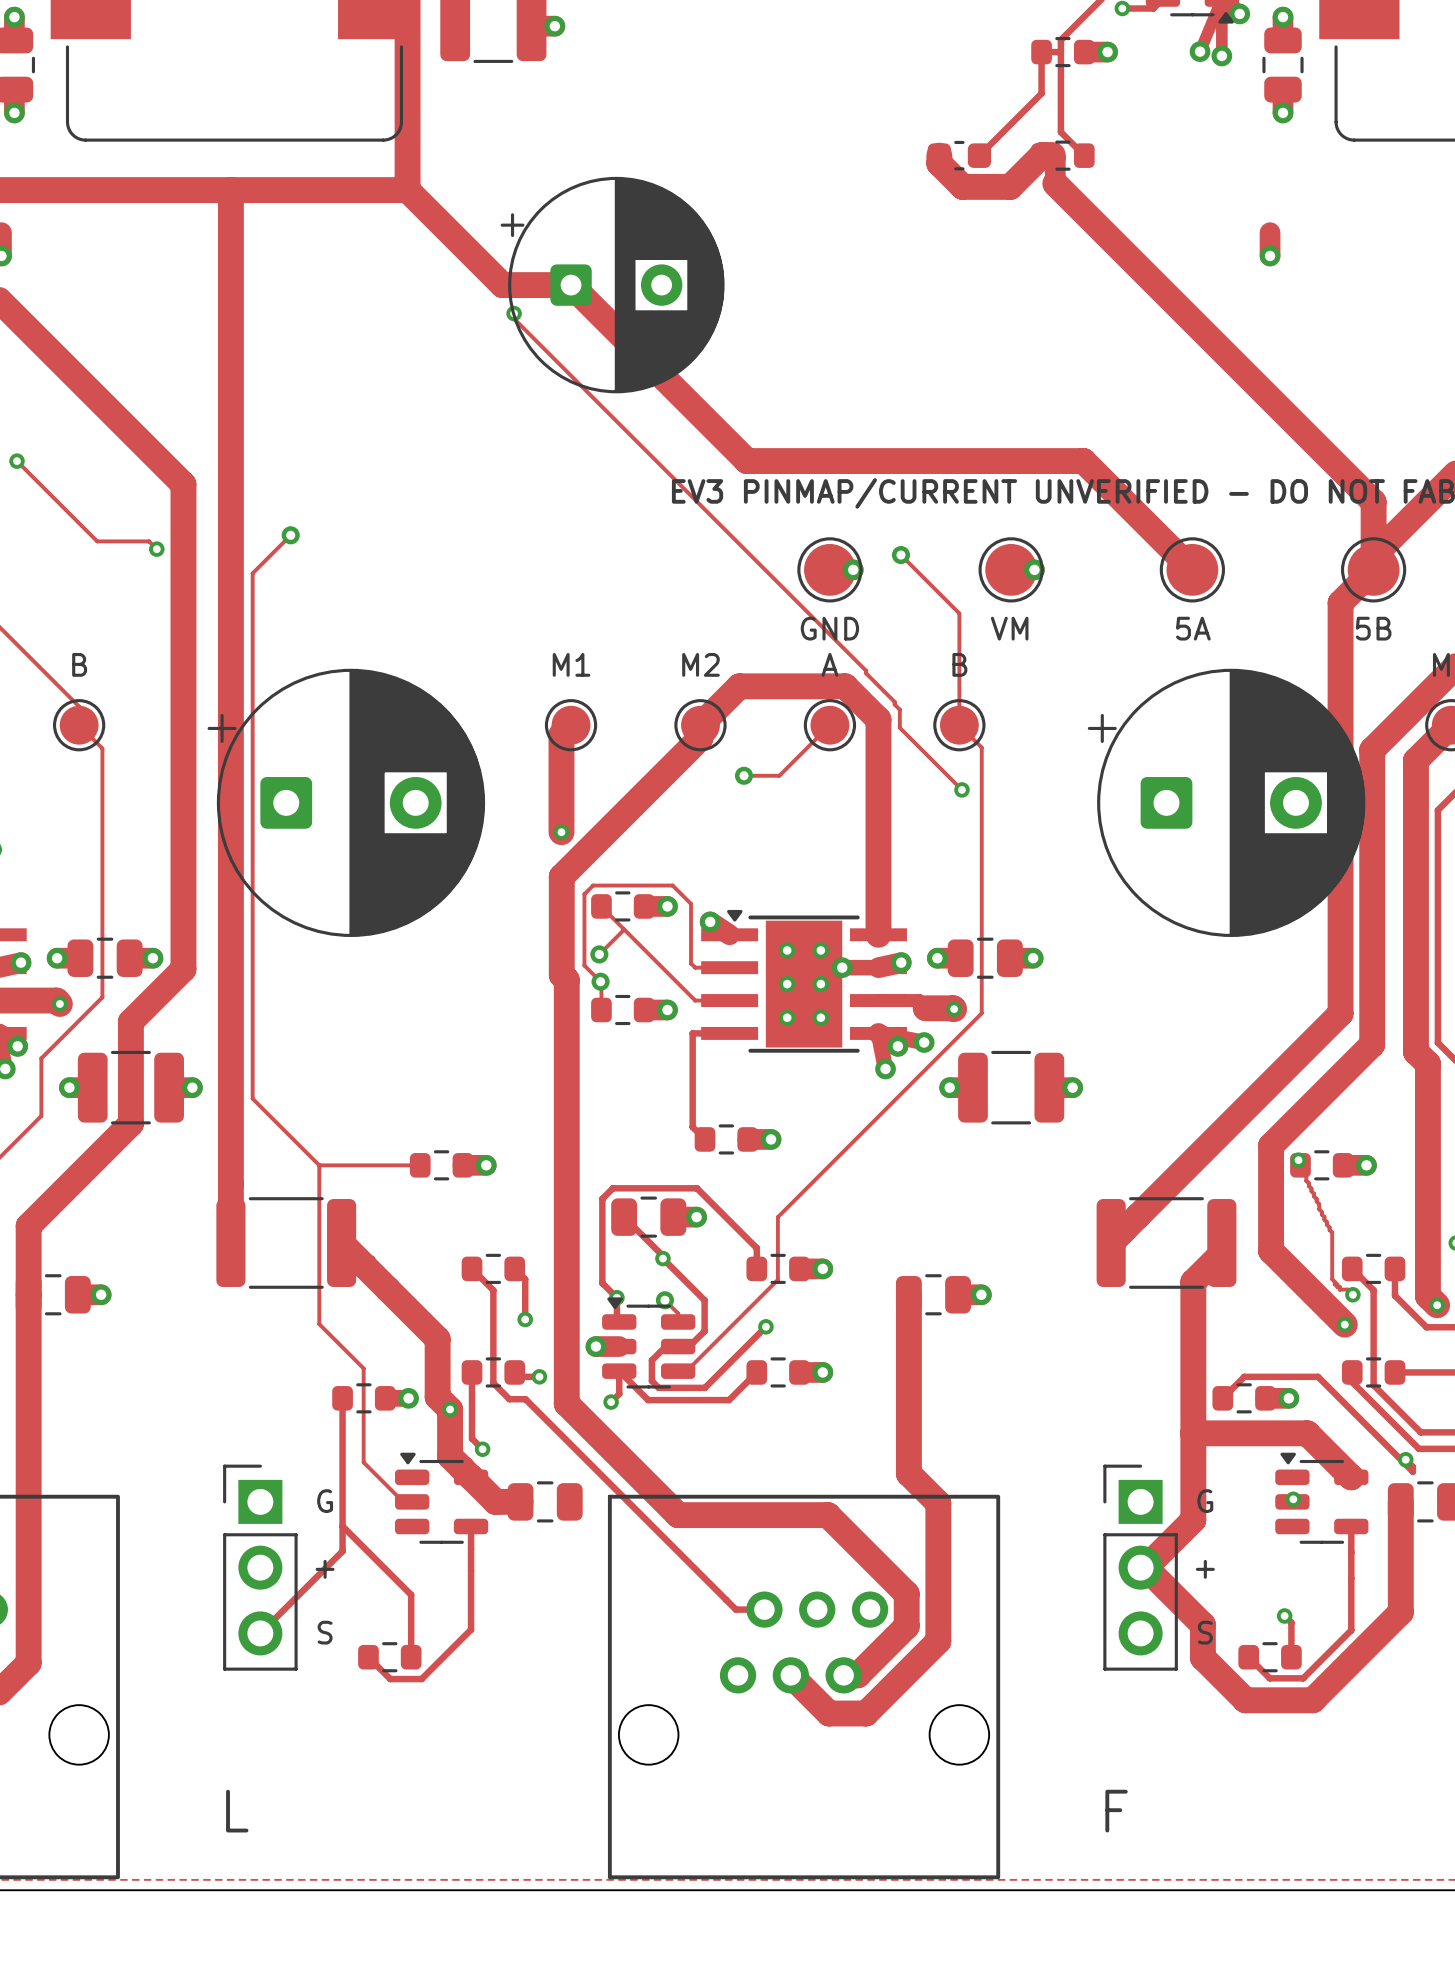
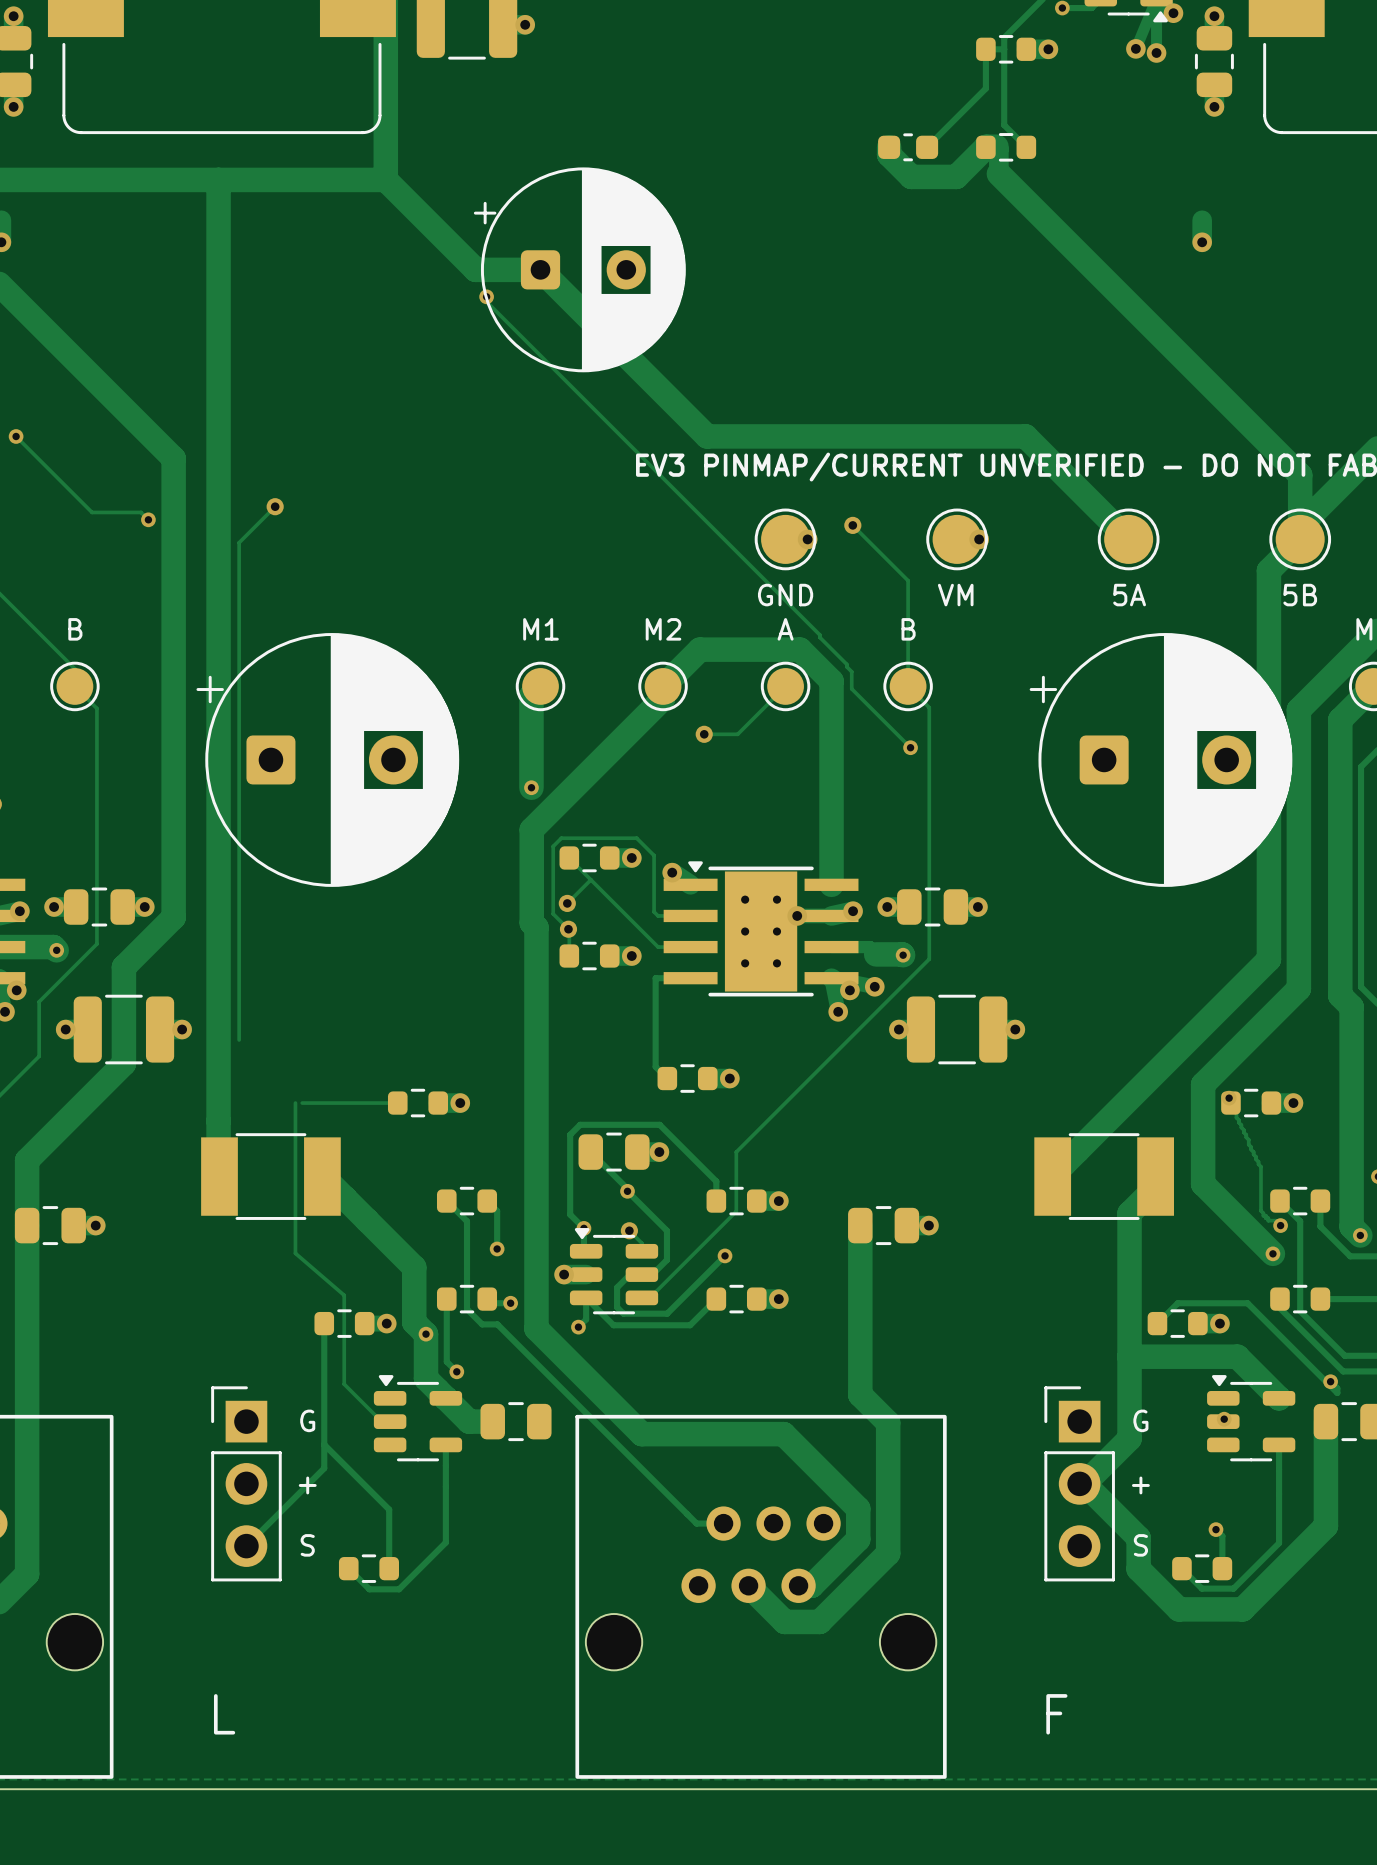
track: (252, 1098) (319, 1165) (319, 1324) (363, 1368) -> (295, 1103) (295, 1253) (344, 1295)
part footprint: [216, 1197, 357, 1289] -> [201, 1133, 341, 1220]
part footprint: [1096, 1197, 1237, 1289] -> [1034, 1133, 1174, 1220]

